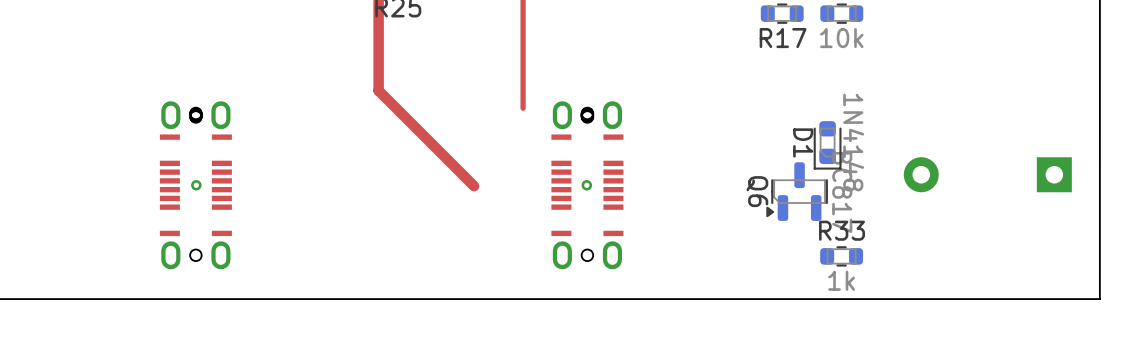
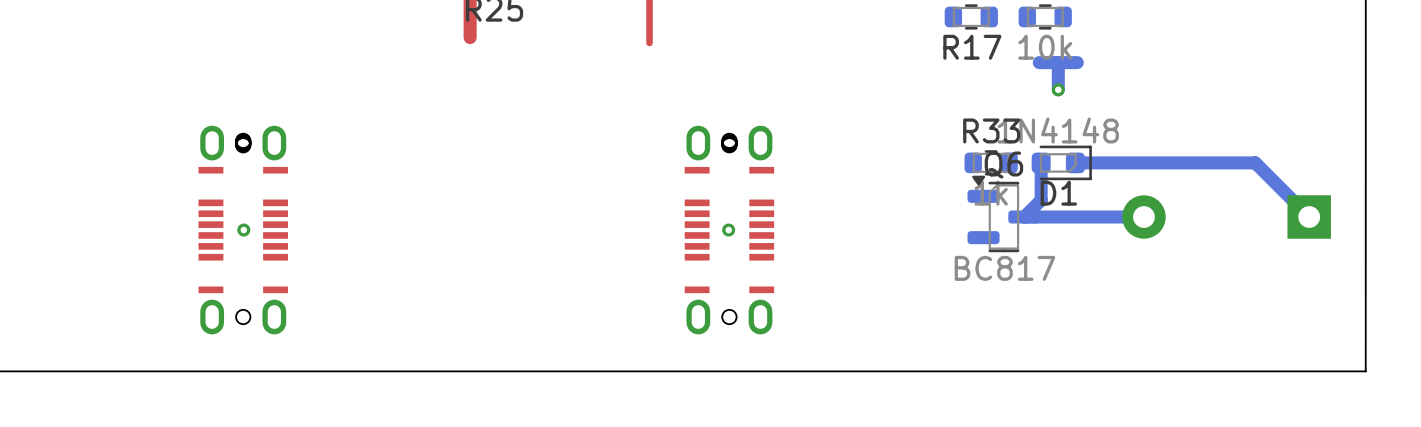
top track: (378, 30) (378, 90) (474, 186) -> none
top track: (523, 34) (523, 108) -> none
bottom track: none -> (1058, 62) (1058, 89)
bottom track: none -> (1077, 62) (1039, 62)
via: none -> (1058, 89)
bottom track: none -> (1041, 162) (1041, 200) (1024, 216) (1143, 216)
bottom track: none -> (1075, 162) (1255, 162) (1309, 216)
D1 rotation: 0° (827, 145) -> 90° counterclockwise (1061, 162)
D1 position: (827, 145) -> (1061, 162)
Q6 rotation: 0° (797, 191) -> 90° clockwise (1003, 213)
R33 position: (841, 256) -> (991, 162)

